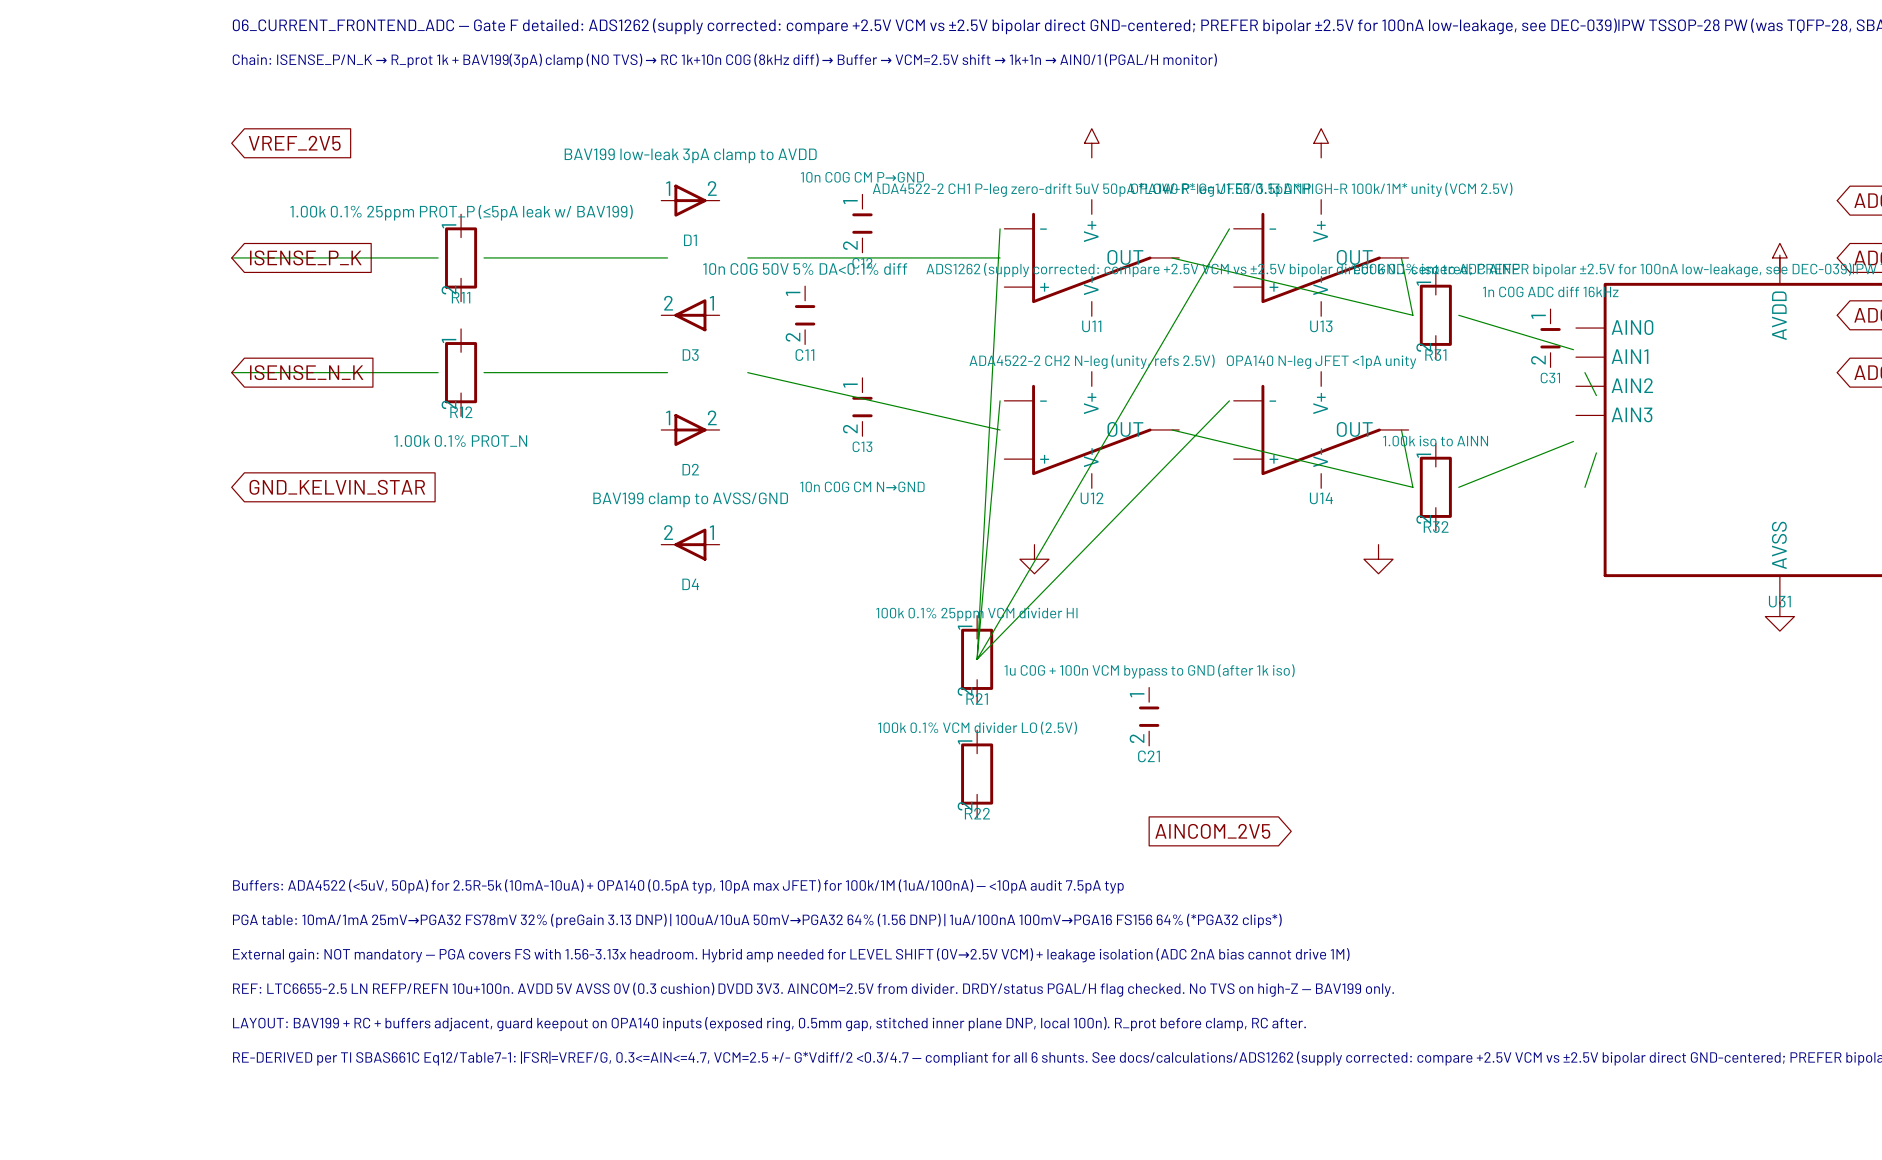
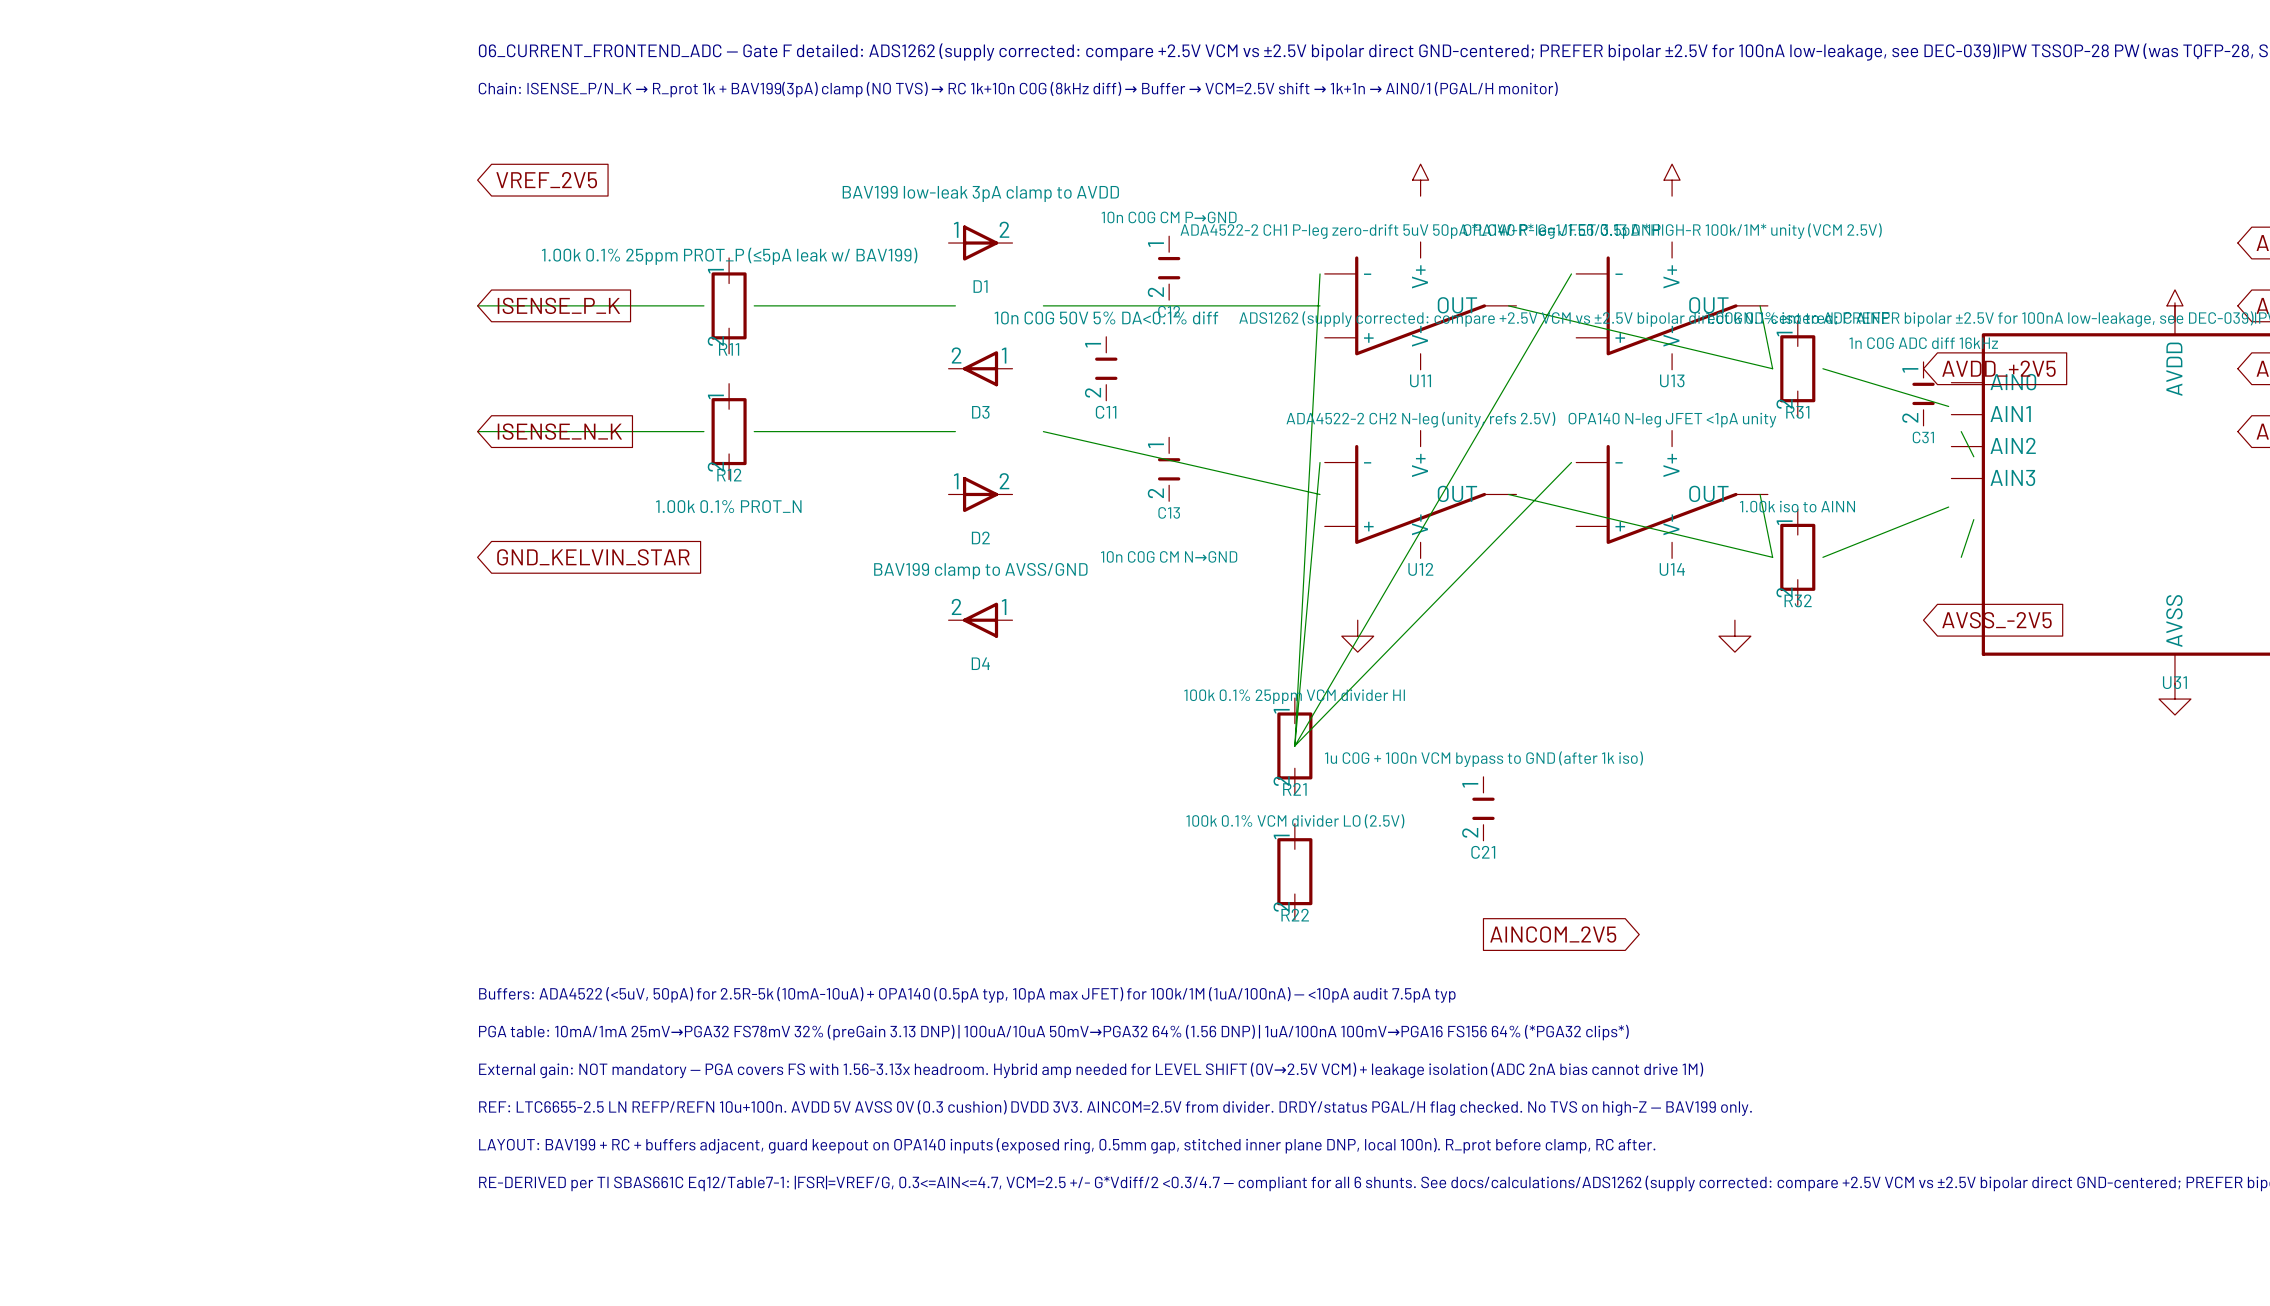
global label: none -> AVDD_+2V5 (1998, 368)
global label: none -> AVSS_-2V5 (1996, 620)

